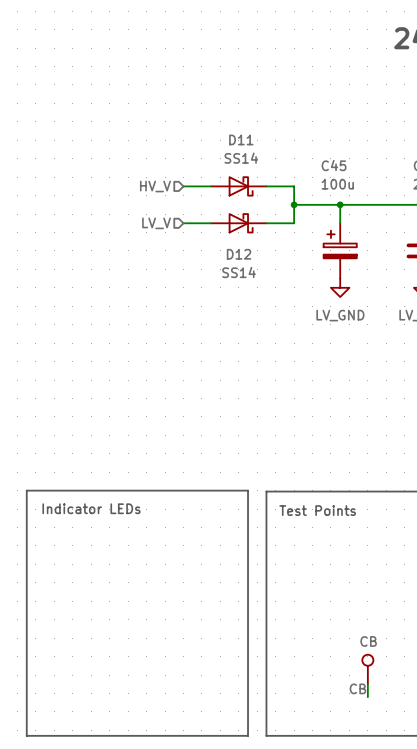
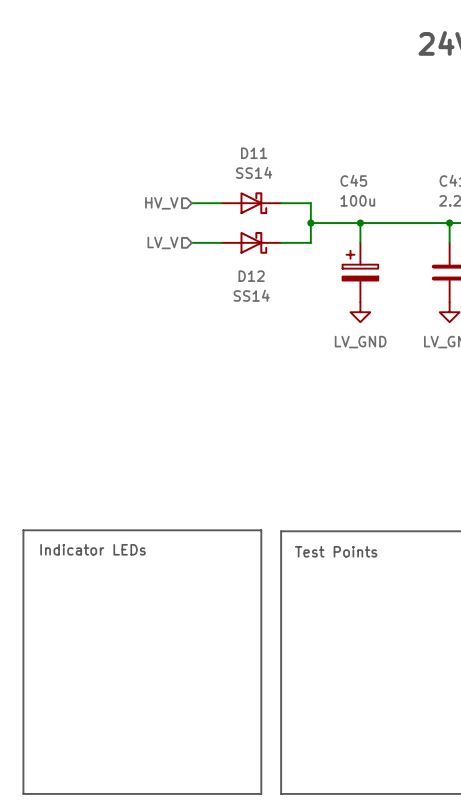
part: CB (367, 669) -> none
wire: (367, 684) (367, 697) -> none
label: CB (357, 688) -> none

